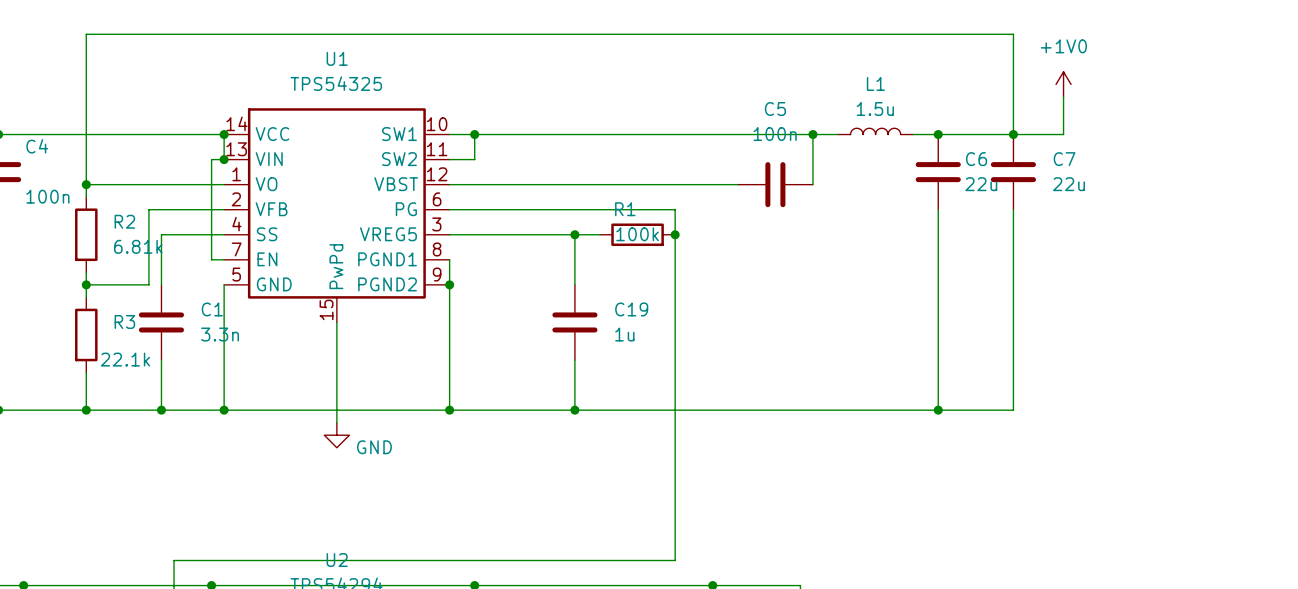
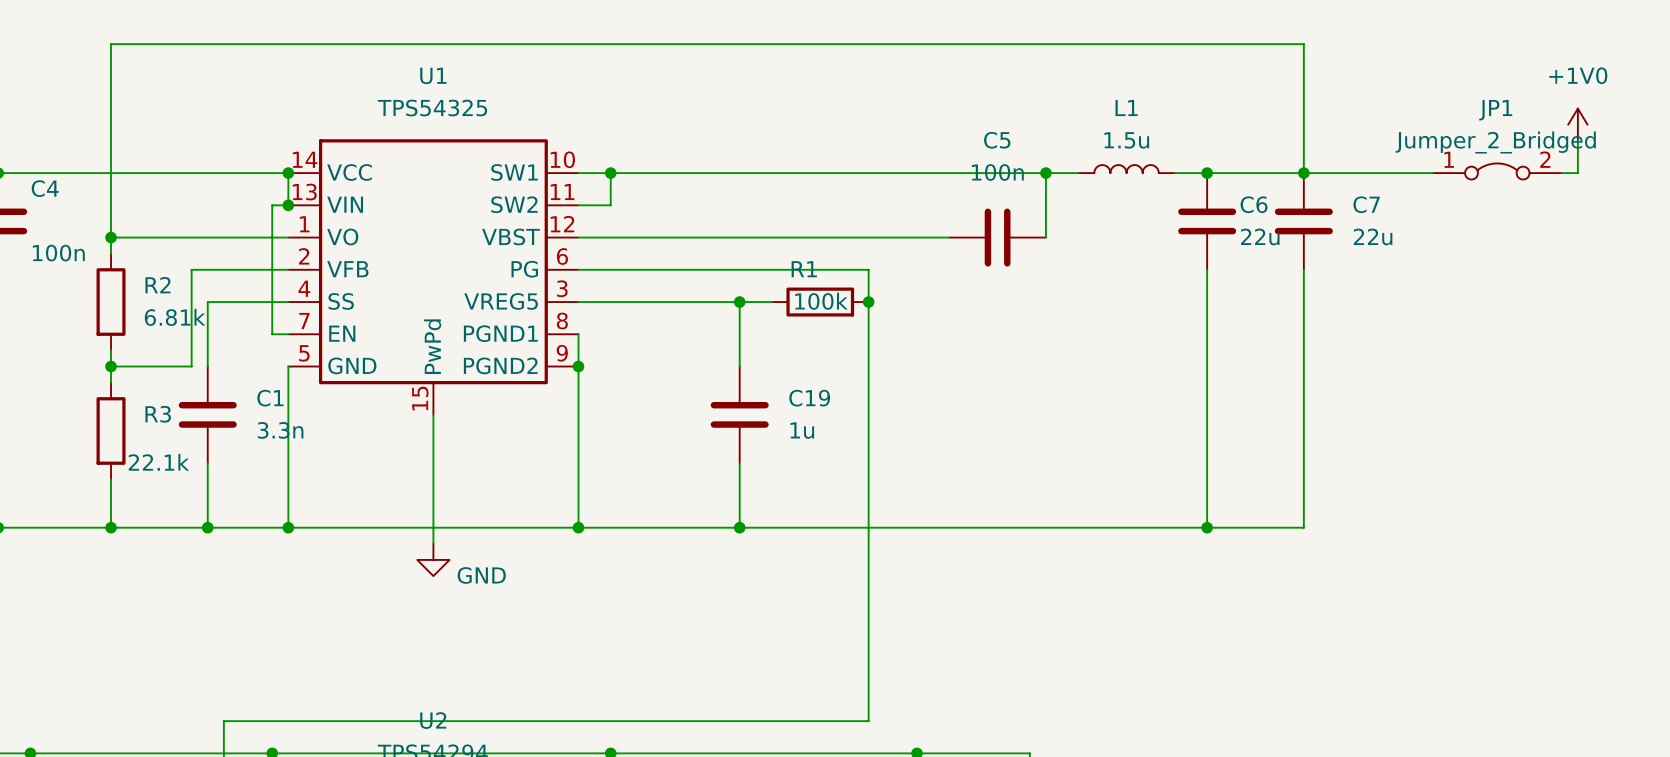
power symbol position: +1V0 (1063, 84) -> +1V0 (1577, 124)
wire: (1063, 96) (1063, 134) -> (1432, 173) (1368, 173)
wire: none -> (1577, 140) (1577, 173) (1561, 173)
JP1: none -> Jumper_2_Bridged (1497, 171)

